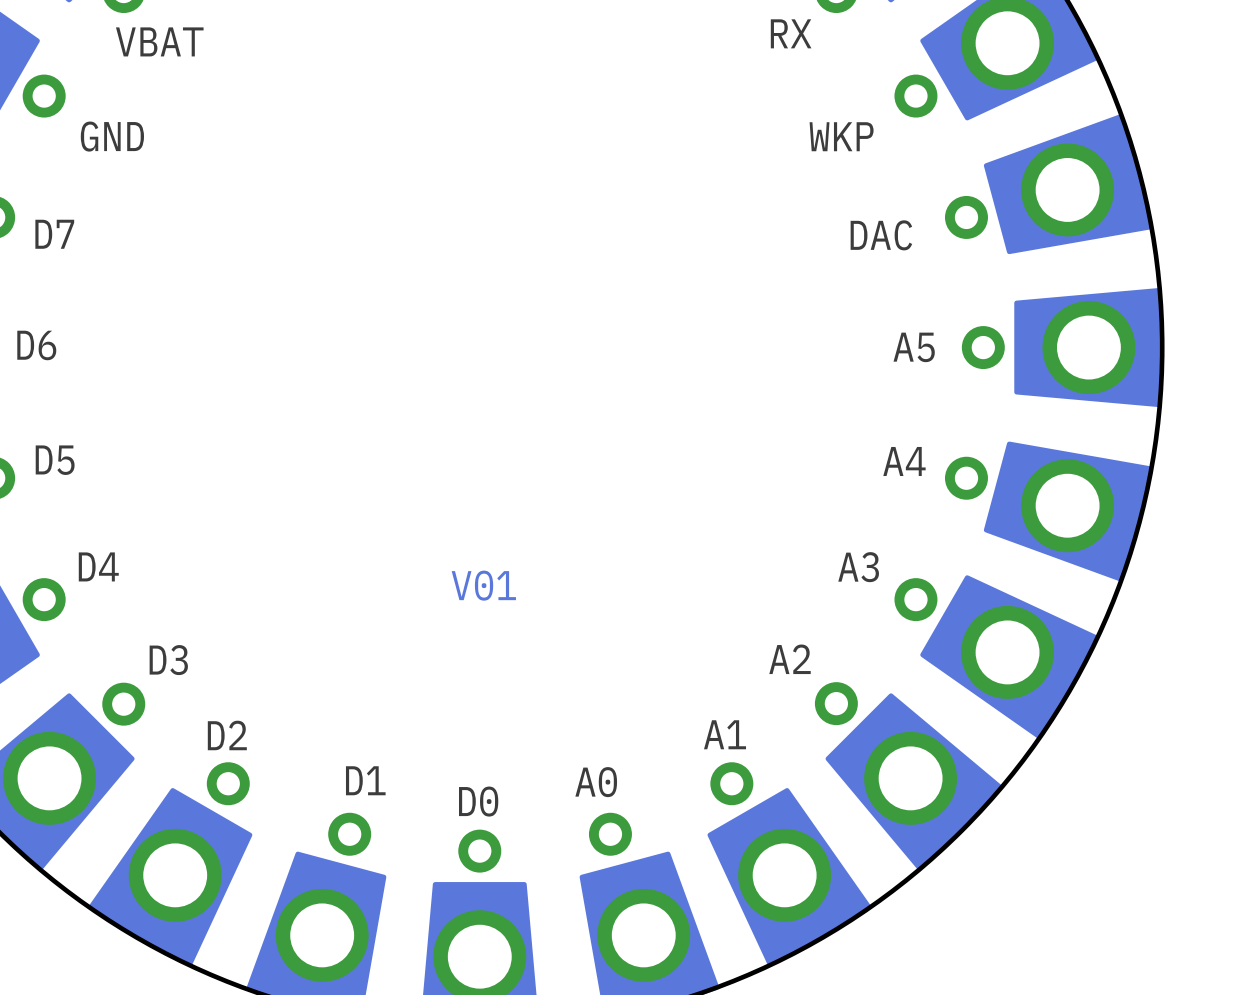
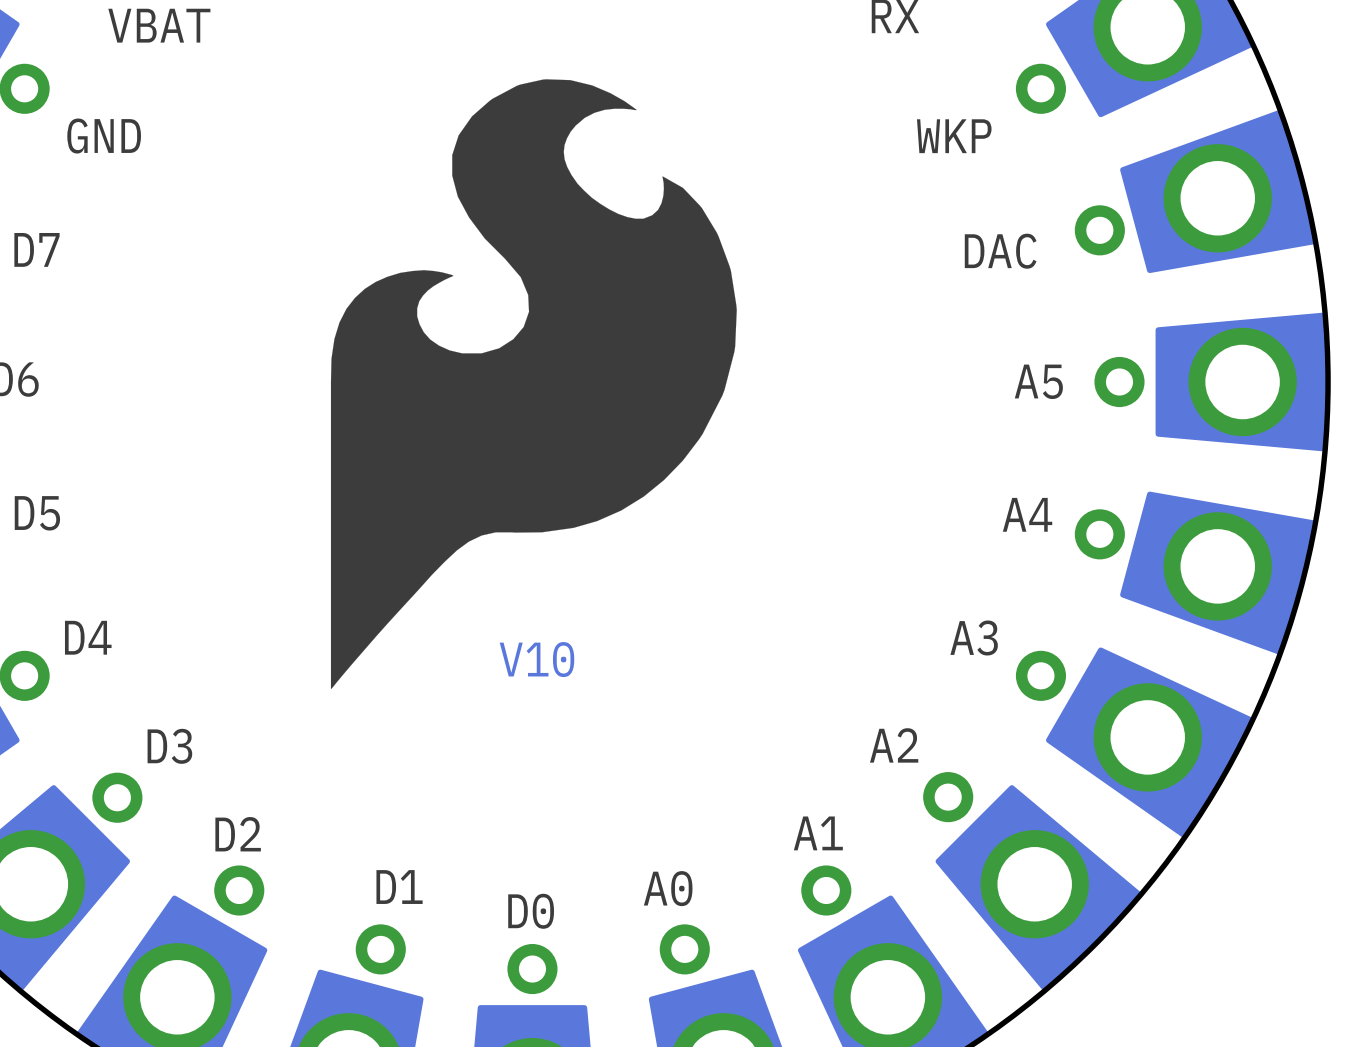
drawing: none -> [330, 79, 737, 690]
text: V01 (483, 585) -> V10 (536, 659)

